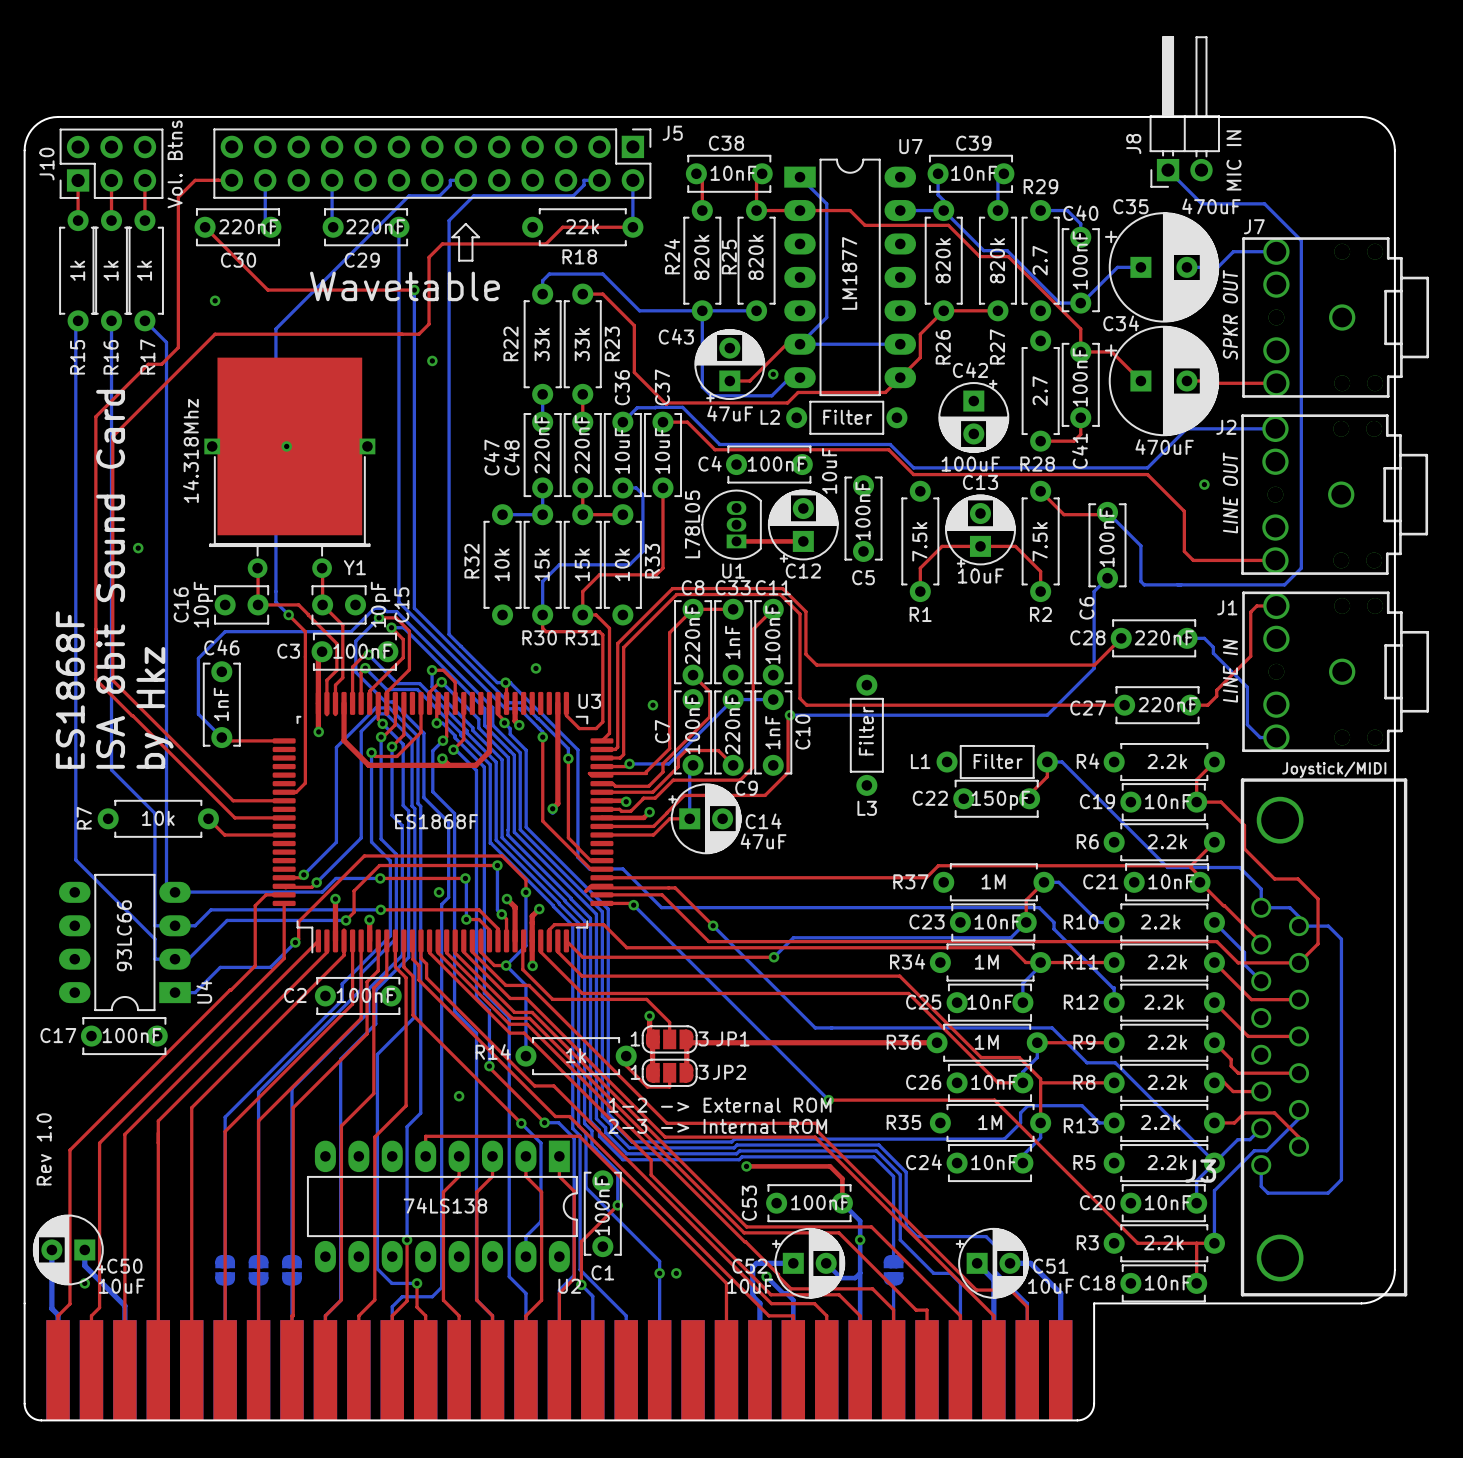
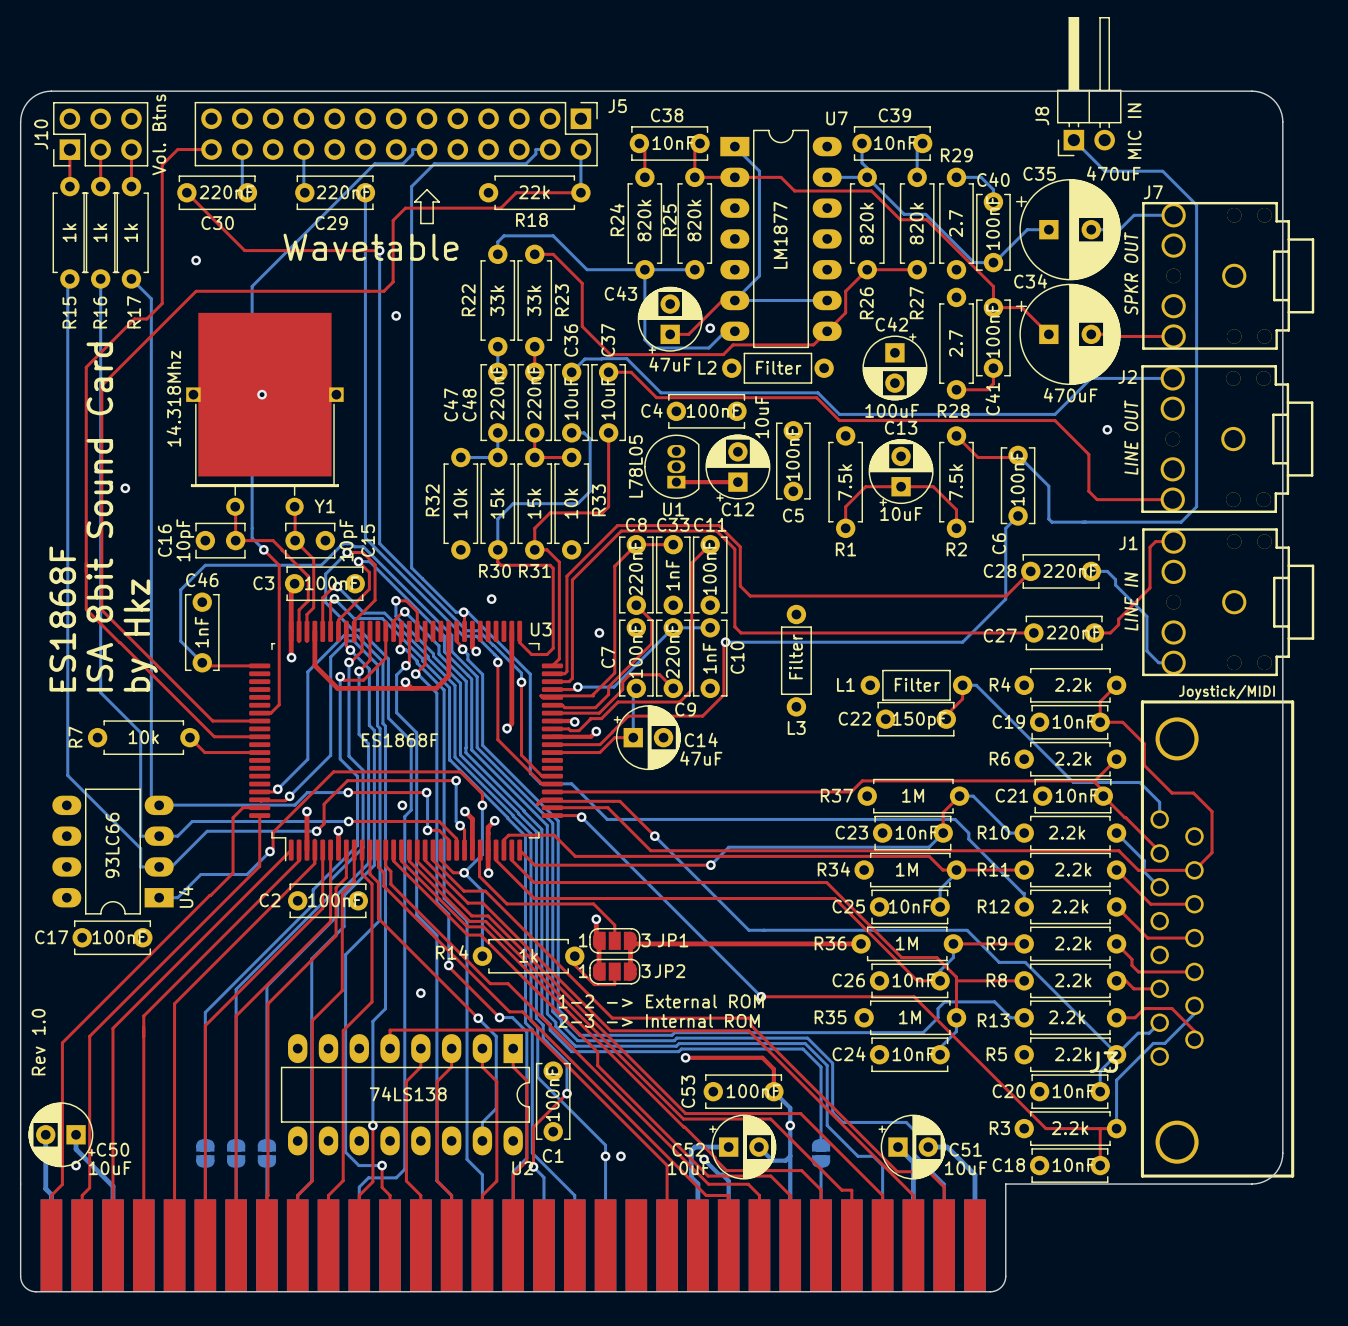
bottom track: (1261, 907) (1289, 907) (1298, 916) (1298, 926) (1328, 926) (1341, 939) (1341, 1179) (1328, 1193) (1267, 1193) (1261, 1186) (1261, 1165) -> none

